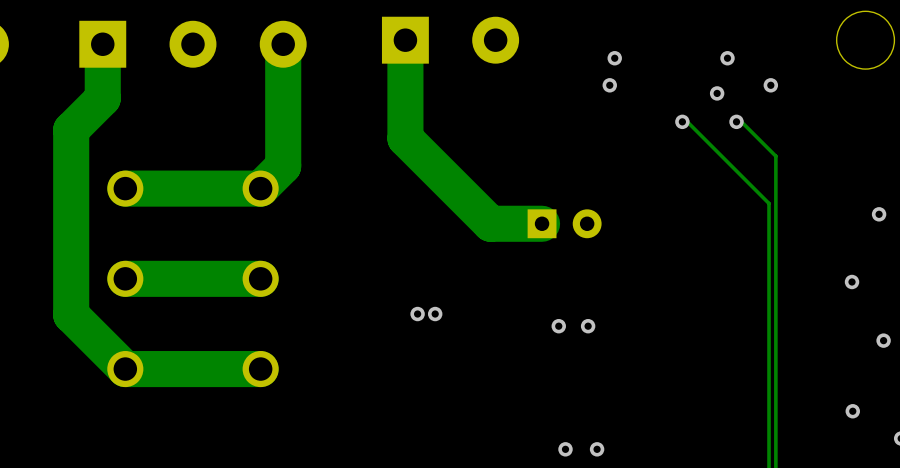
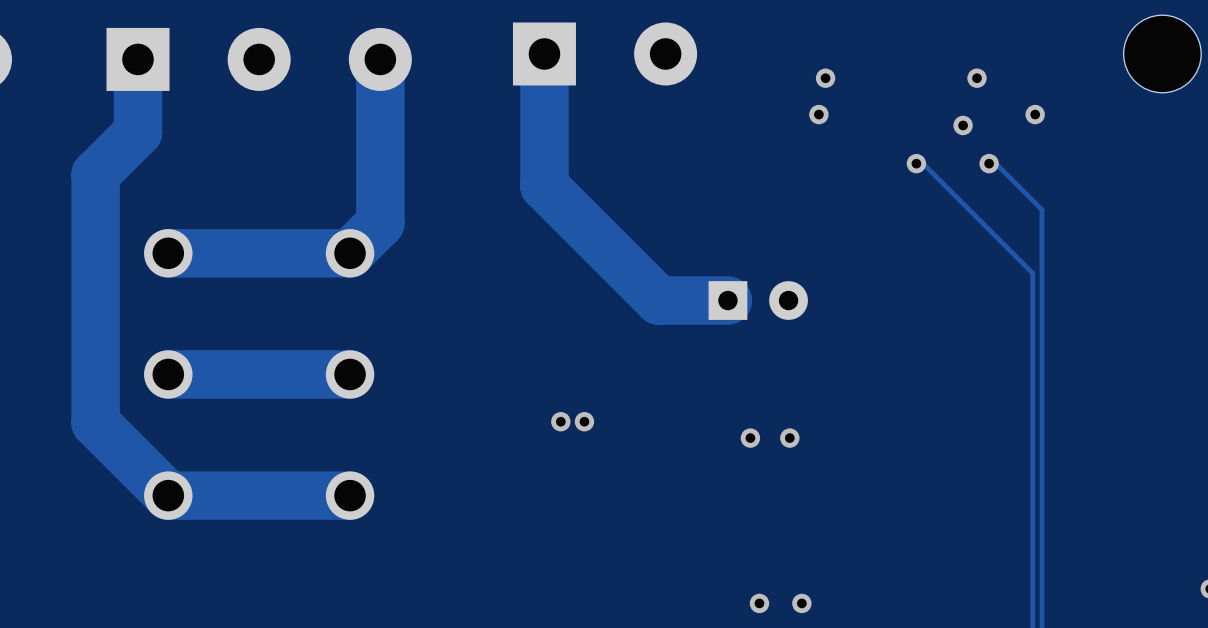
via: (879, 214) -> none
via: (852, 281) -> none
via: (883, 340) -> none
via: (852, 411) -> none

